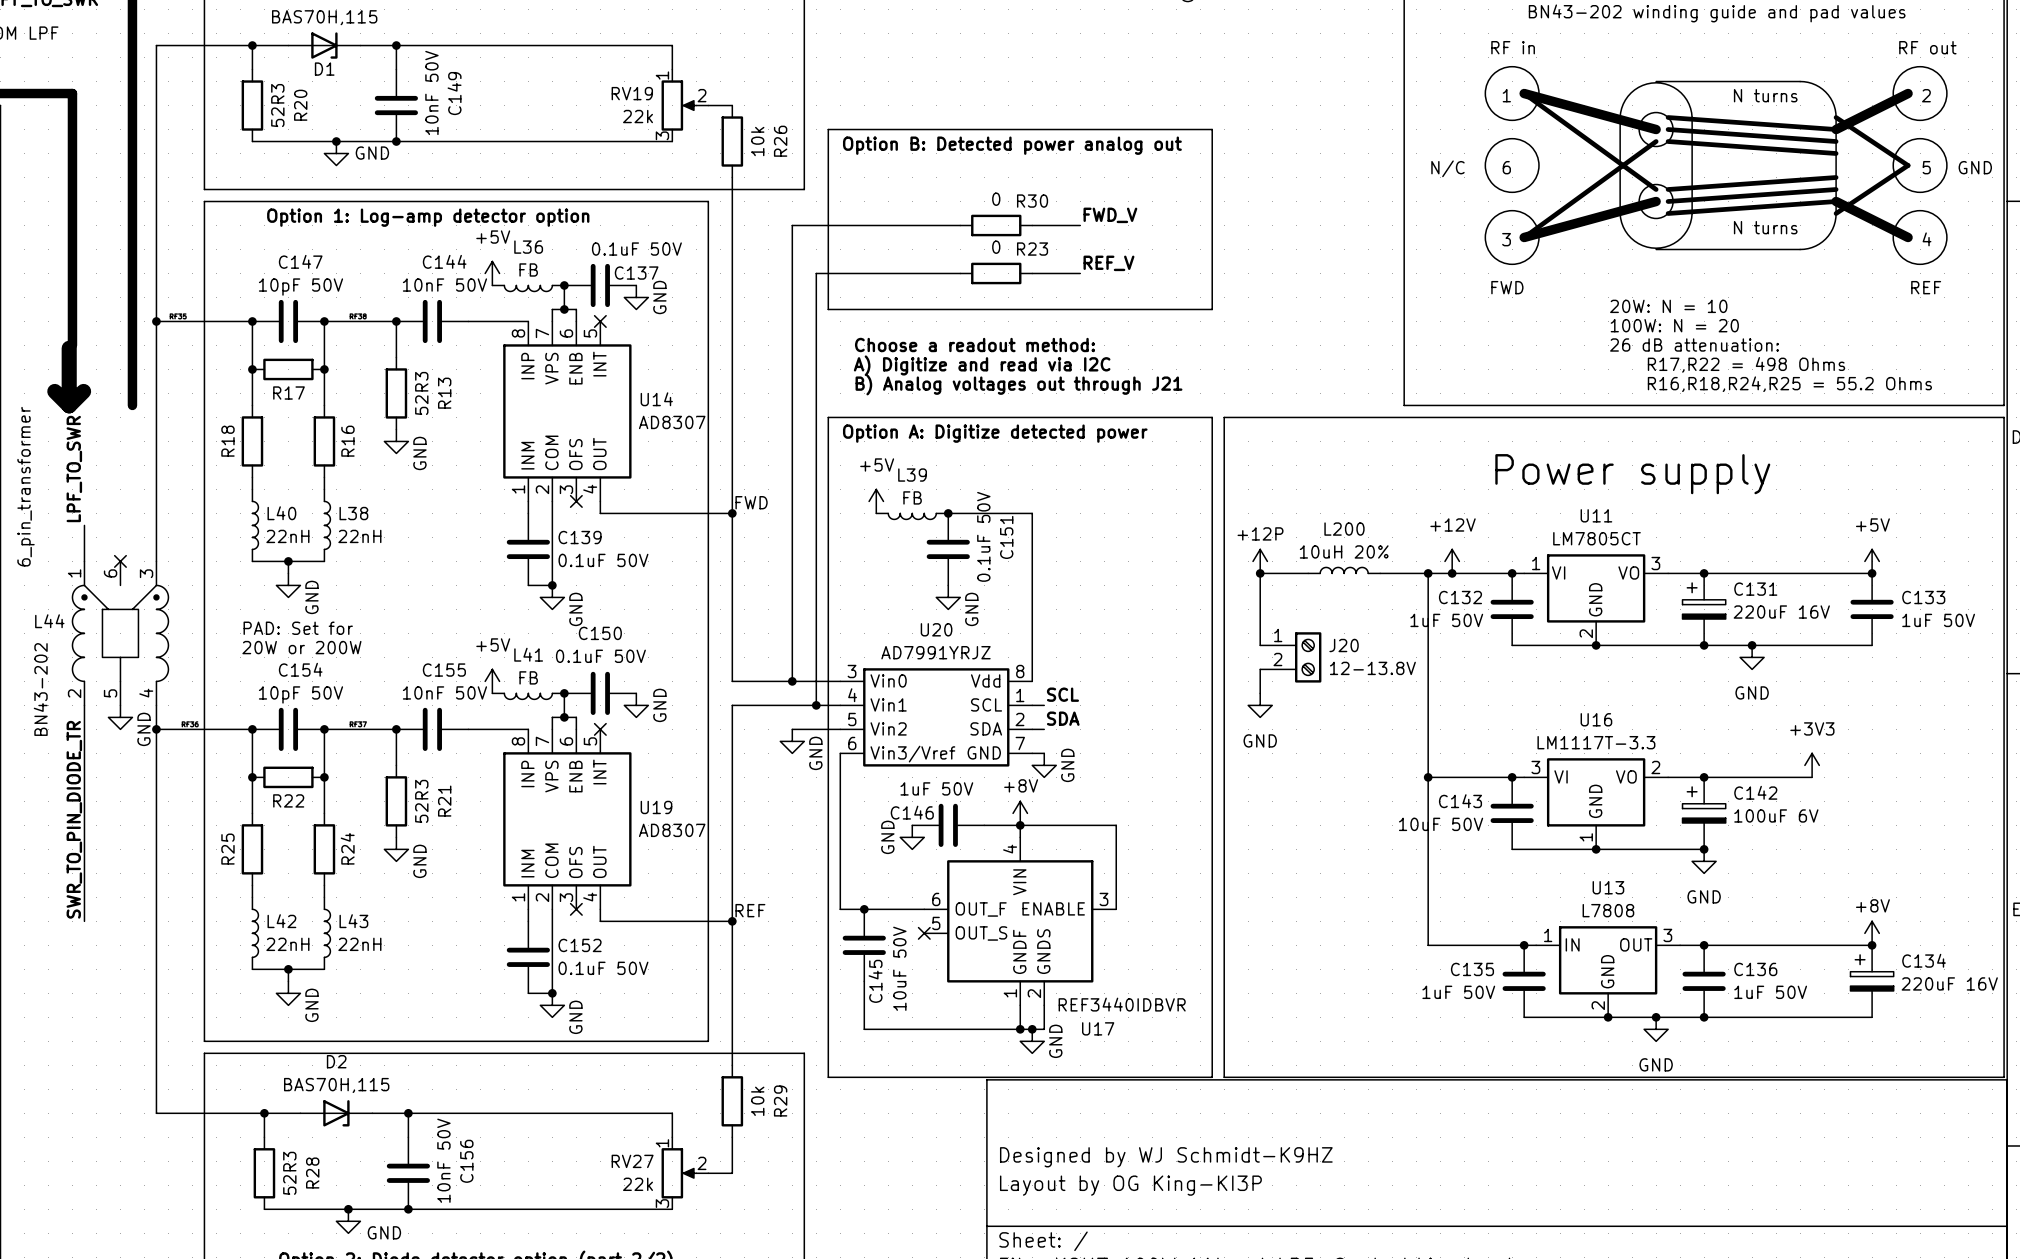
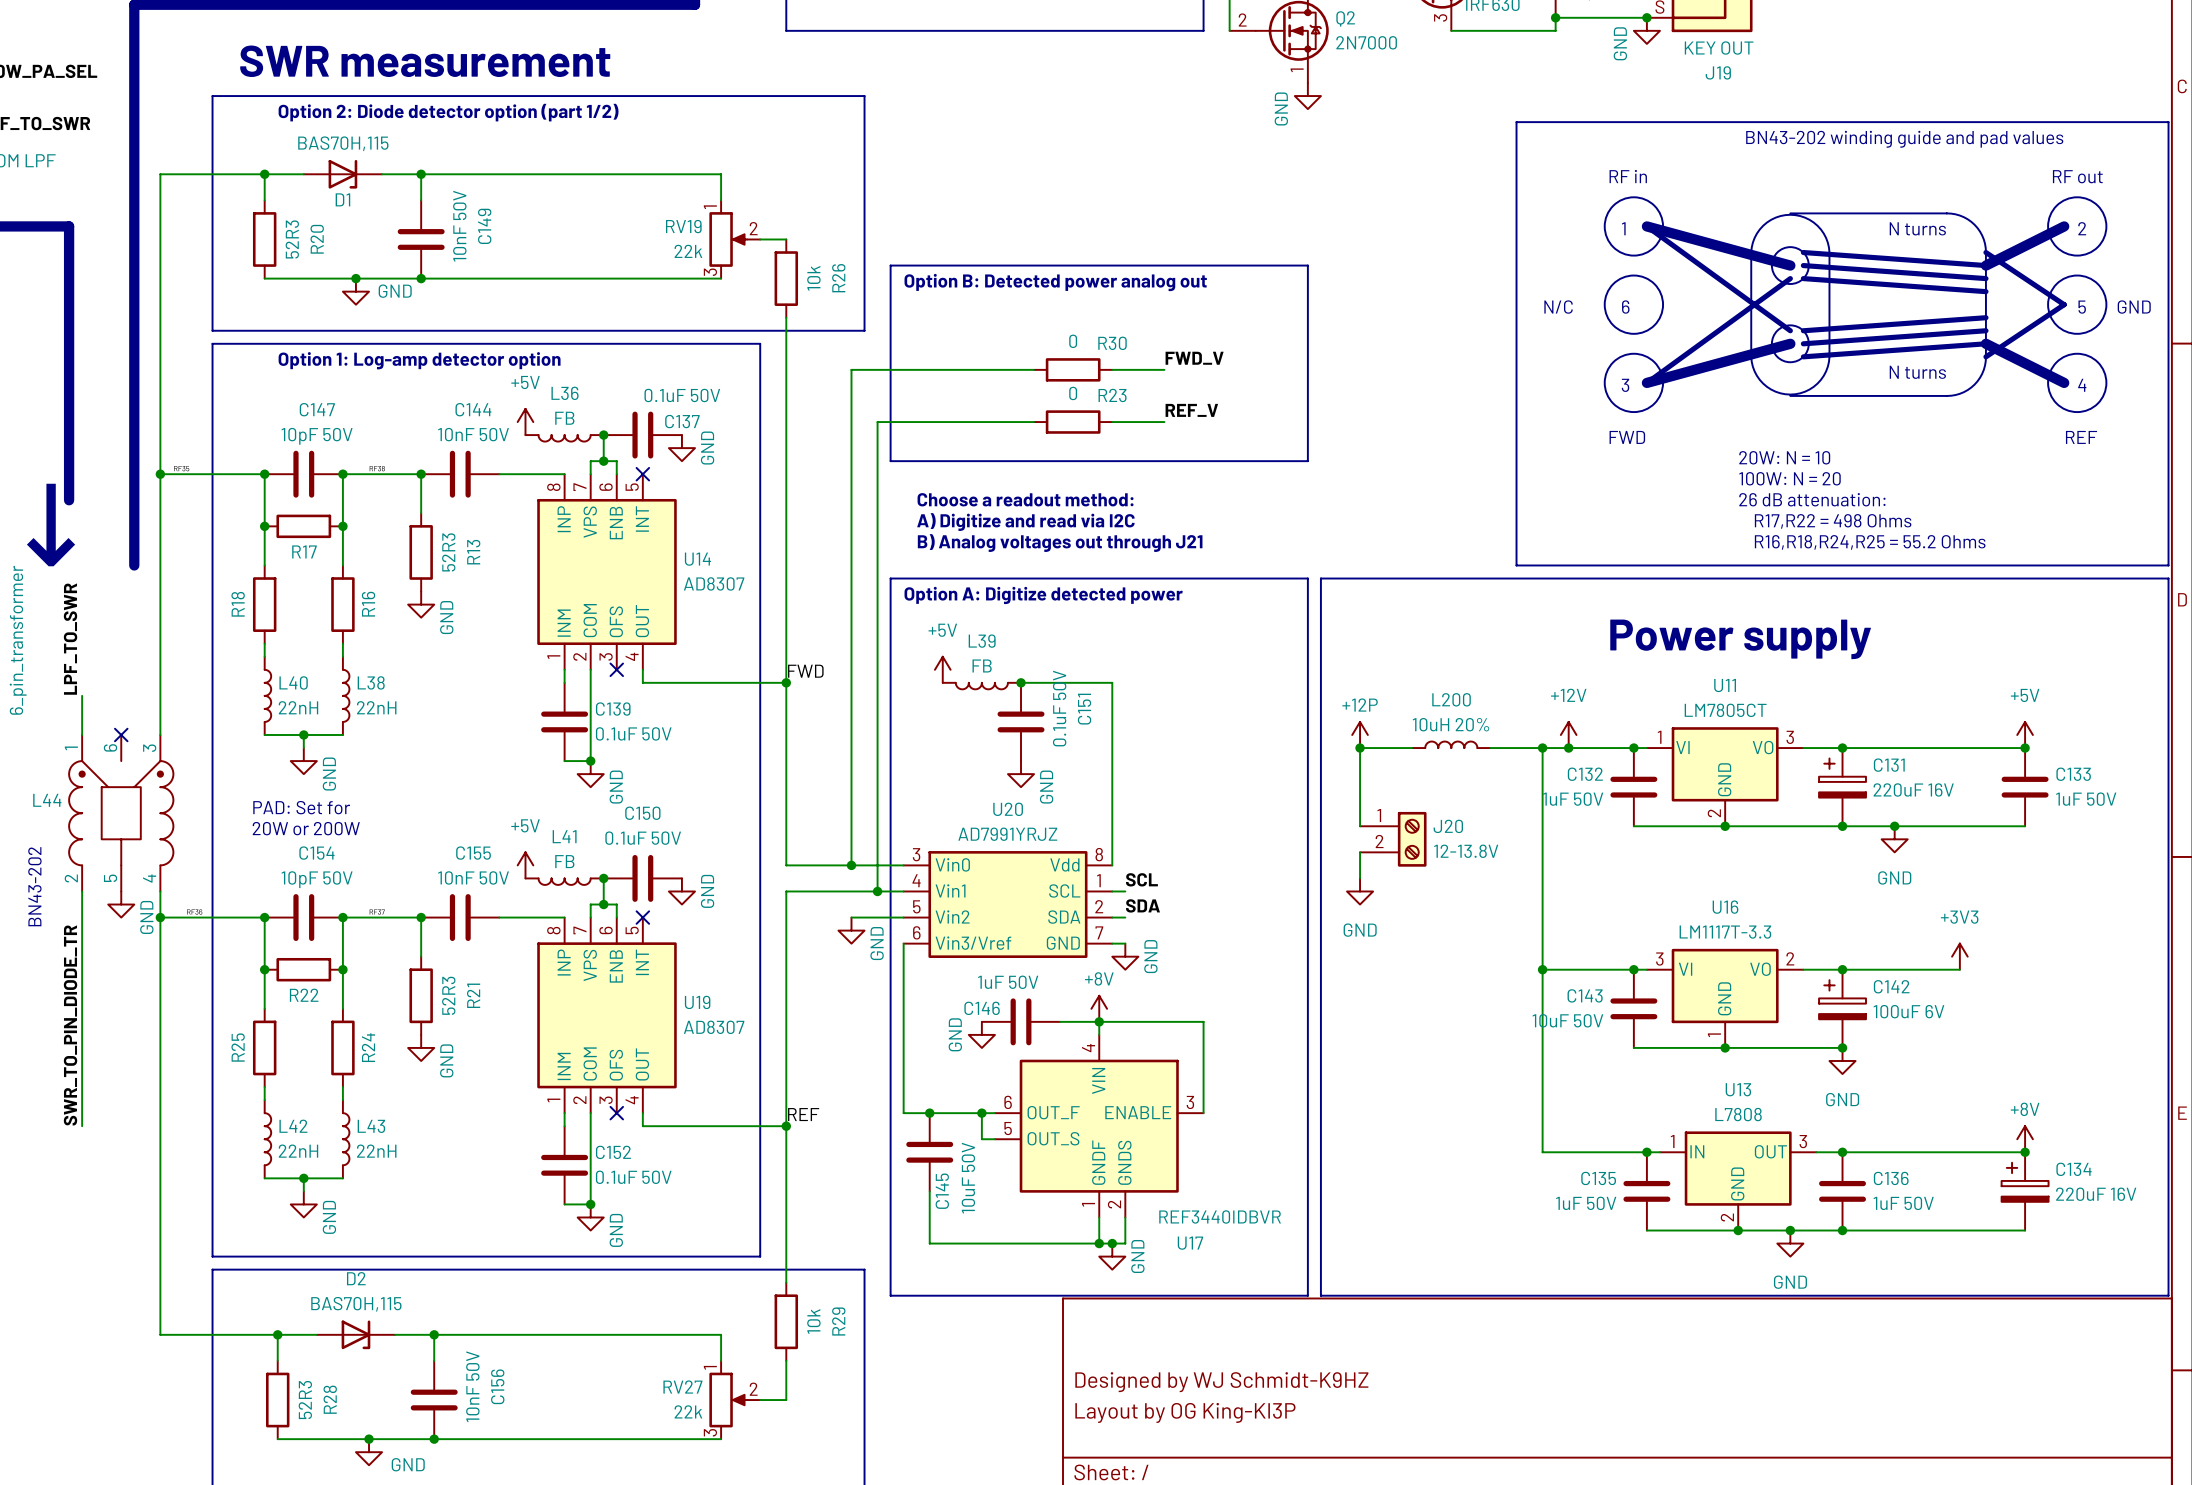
wire: none -> (981, 1113) (981, 1139) (994, 1139)
junction: none -> (981, 1113)
no-connect mark: (924, 933) -> none

